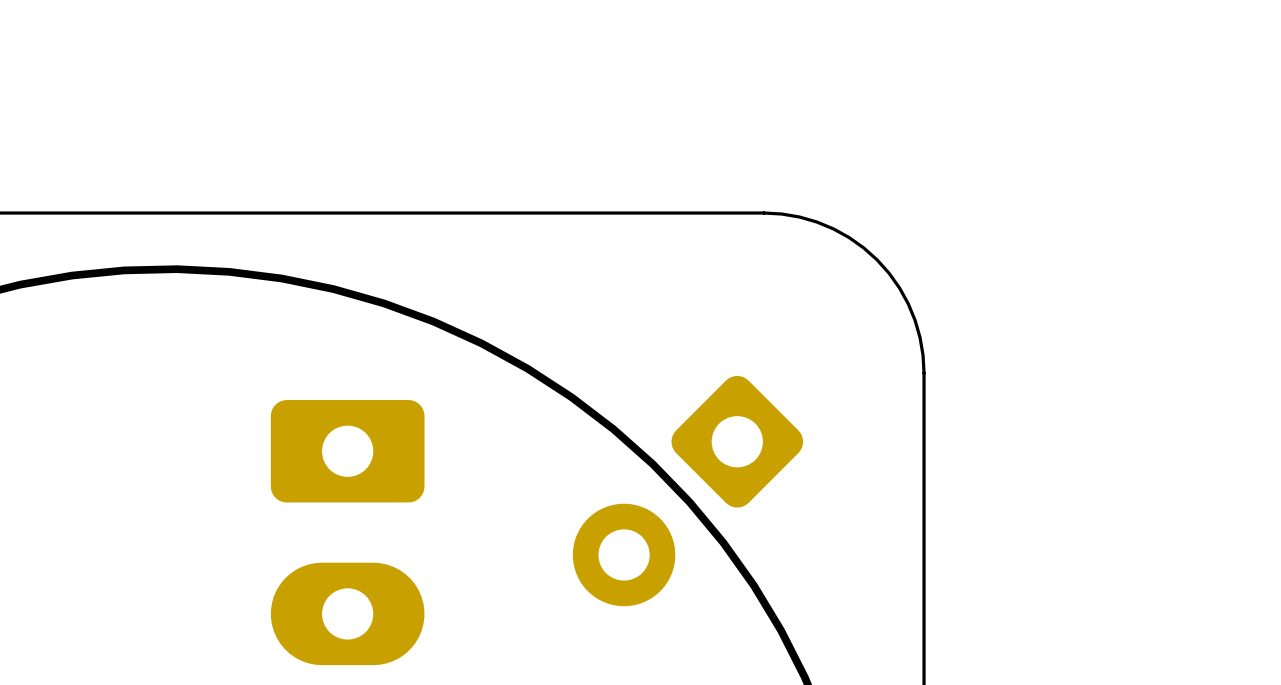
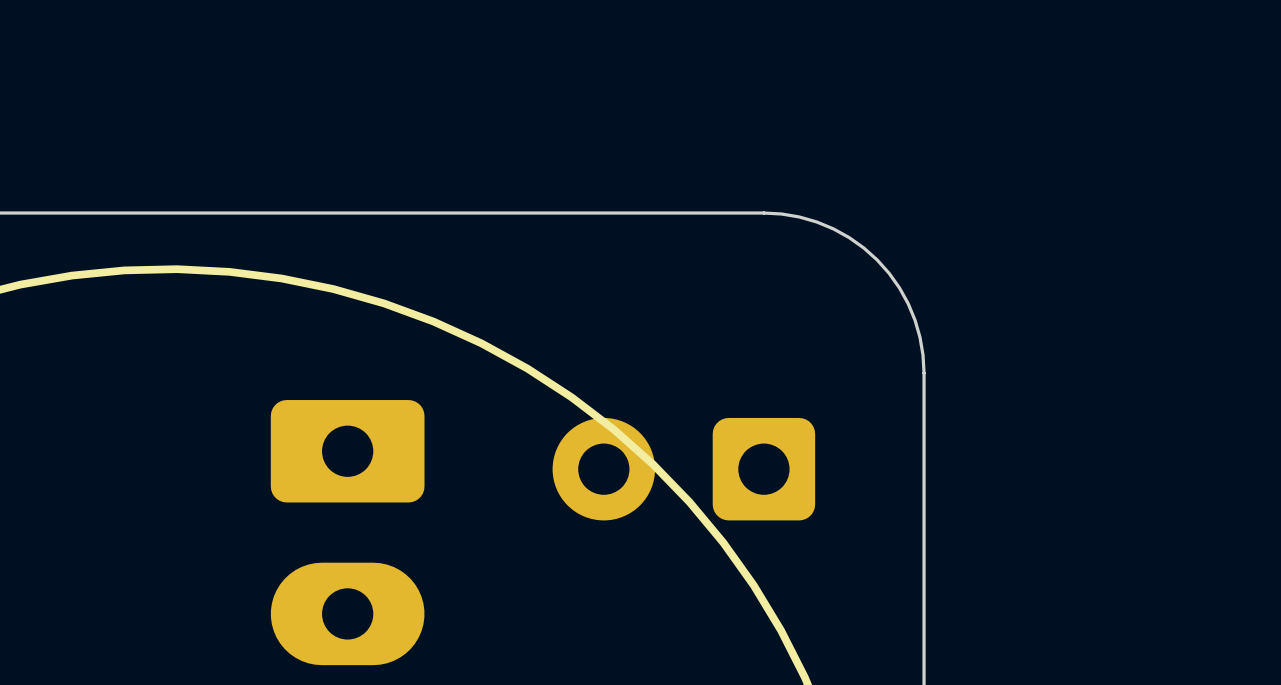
part rotation: 0° (687, 491) -> 45° clockwise (683, 469)

